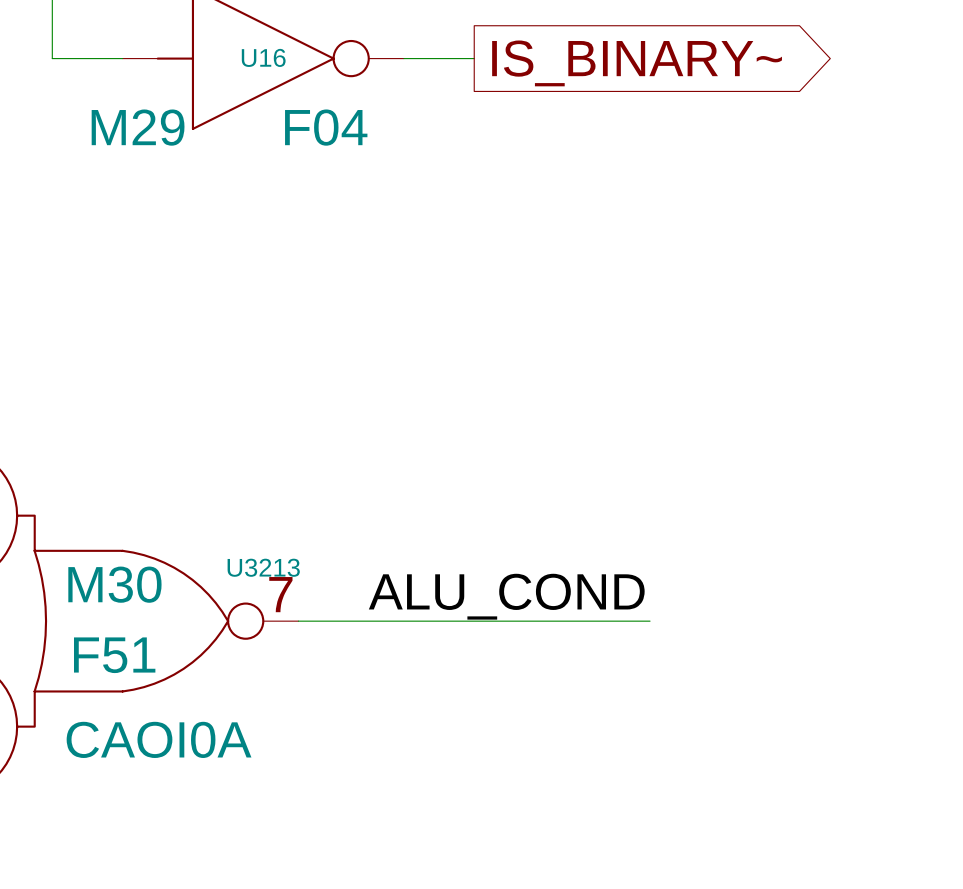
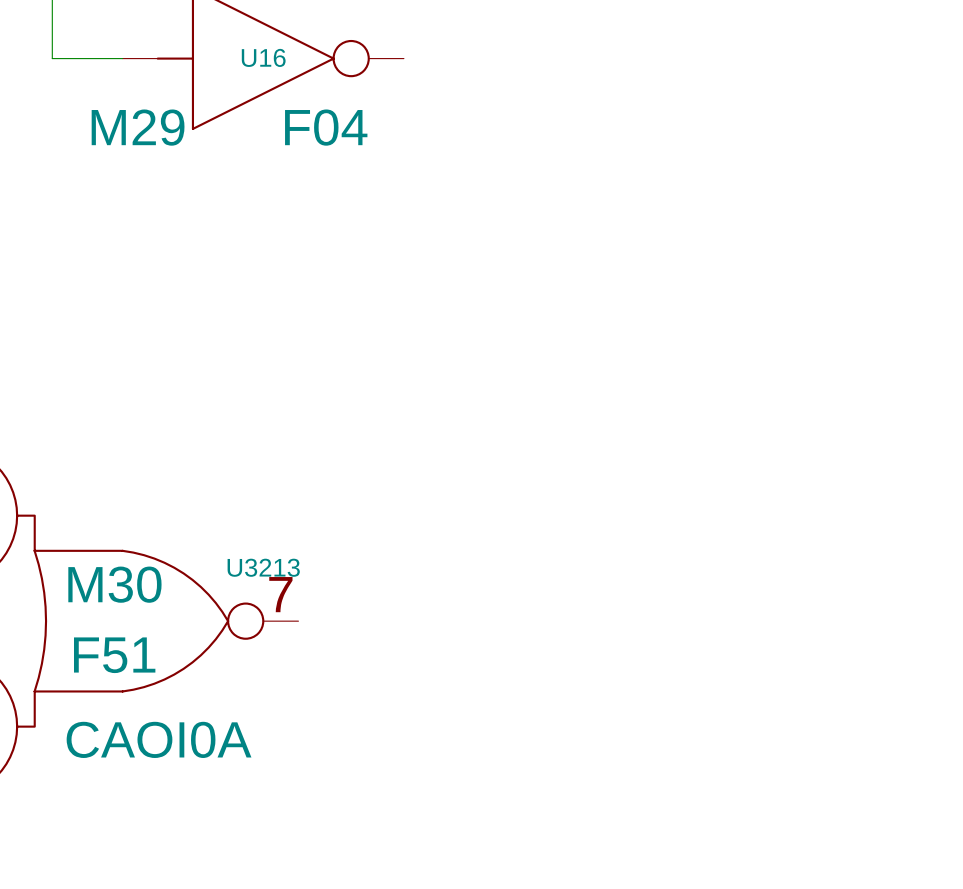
wire: (403, 58) (474, 58) -> none
global label: IS_BINARY~ (637, 63) -> none
label: ALU_COND (506, 596) -> none
wire: (298, 621) (650, 621) -> none

